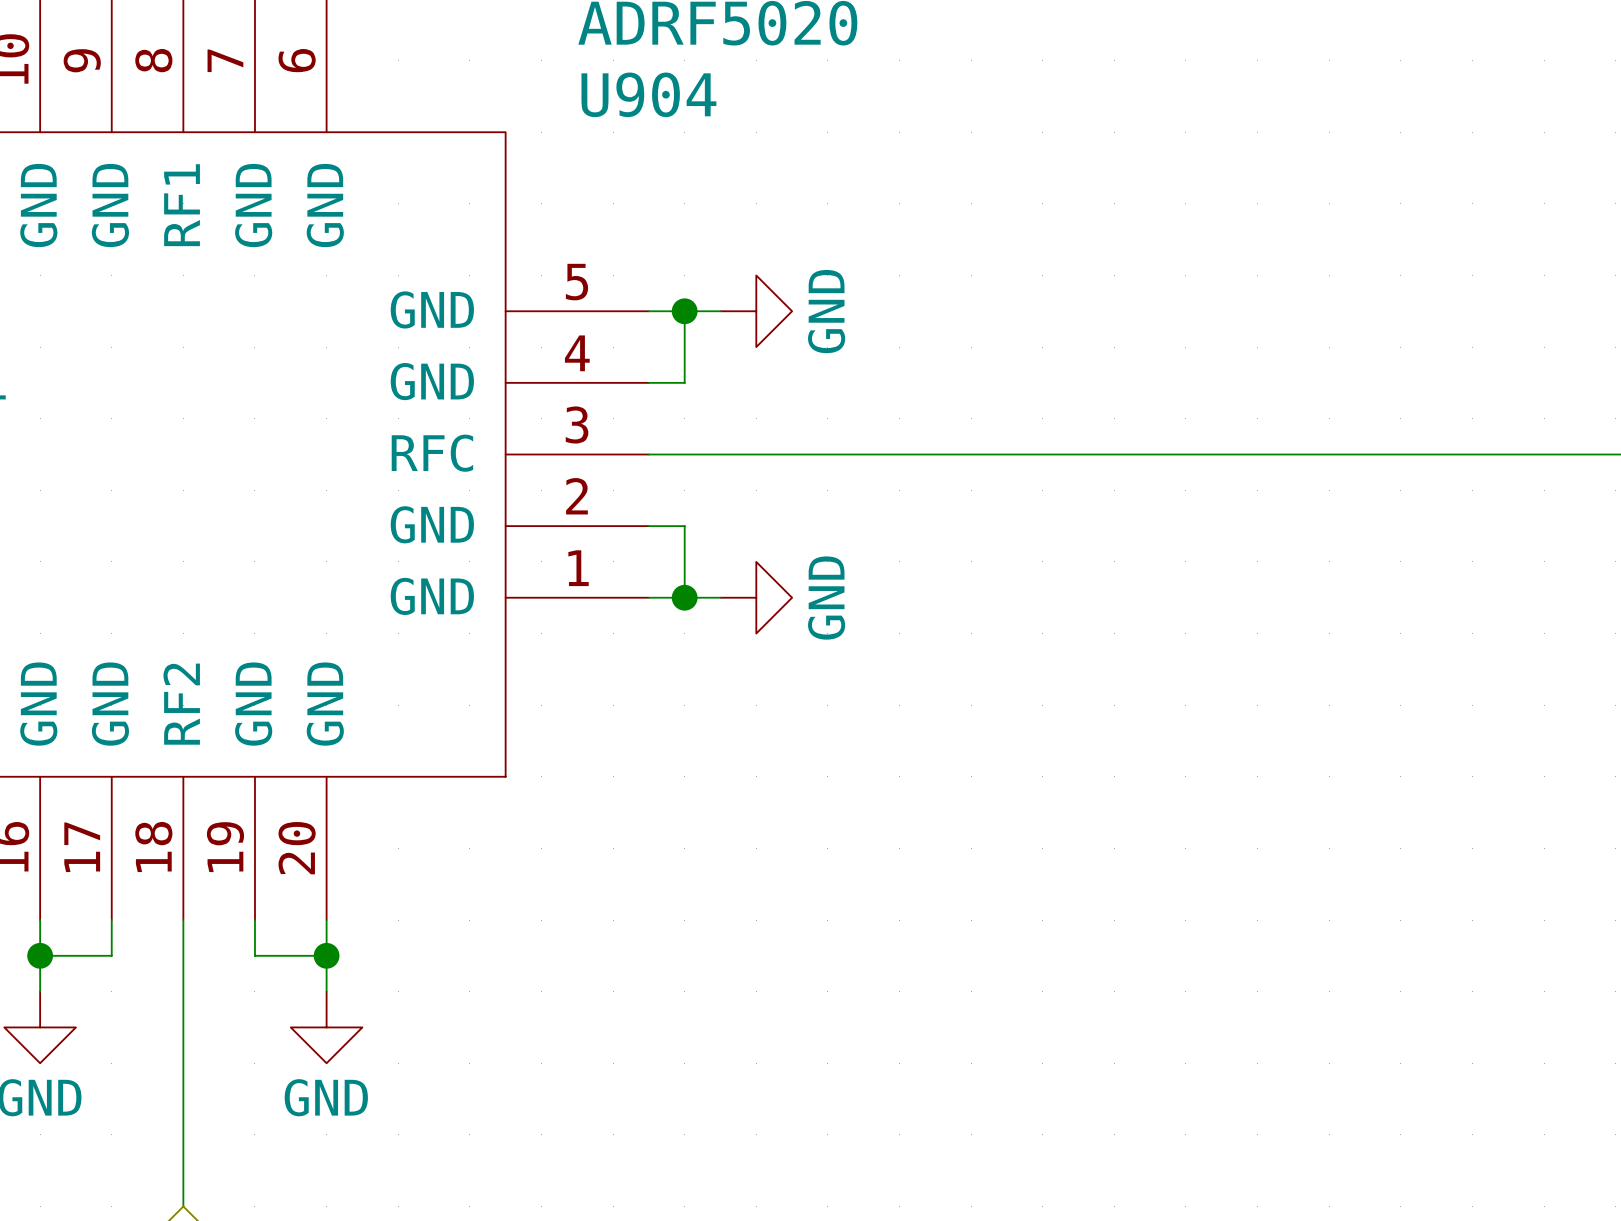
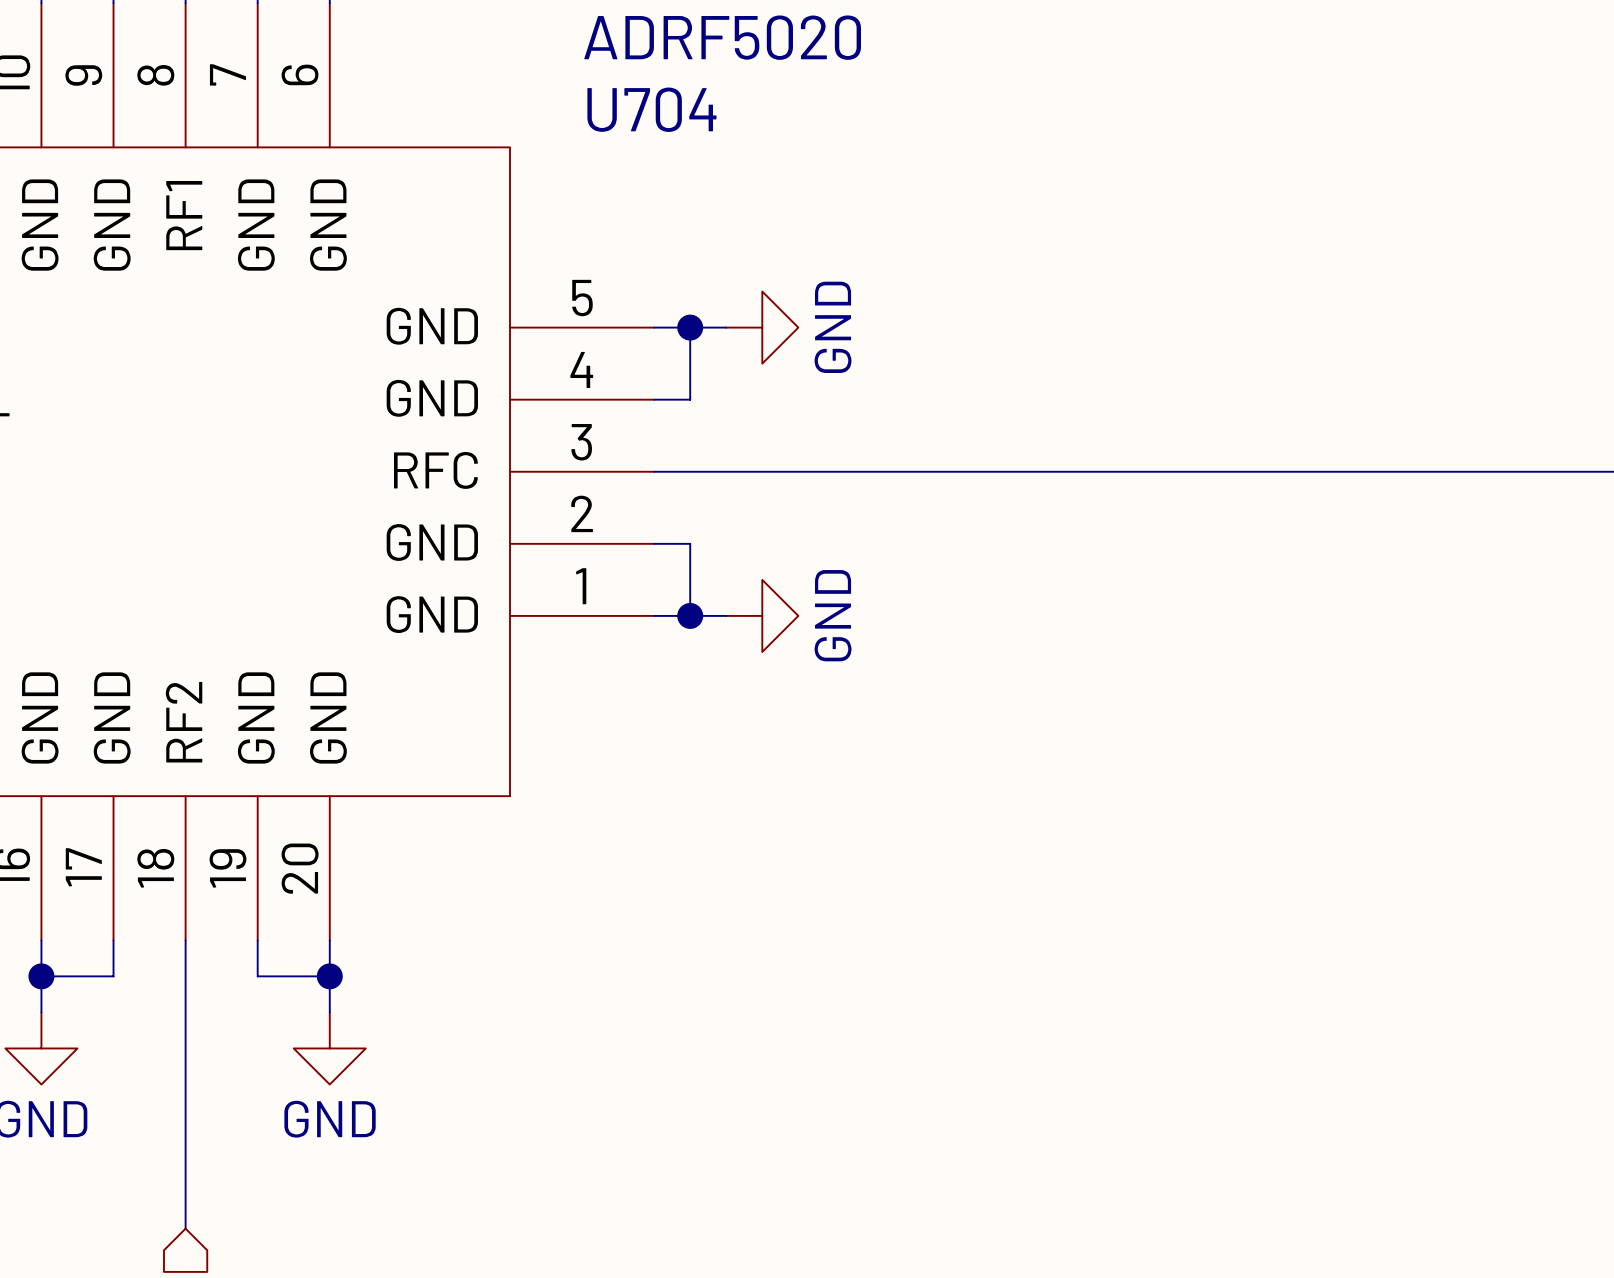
U904 name: U904 (648, 94) -> U704 (651, 109)

